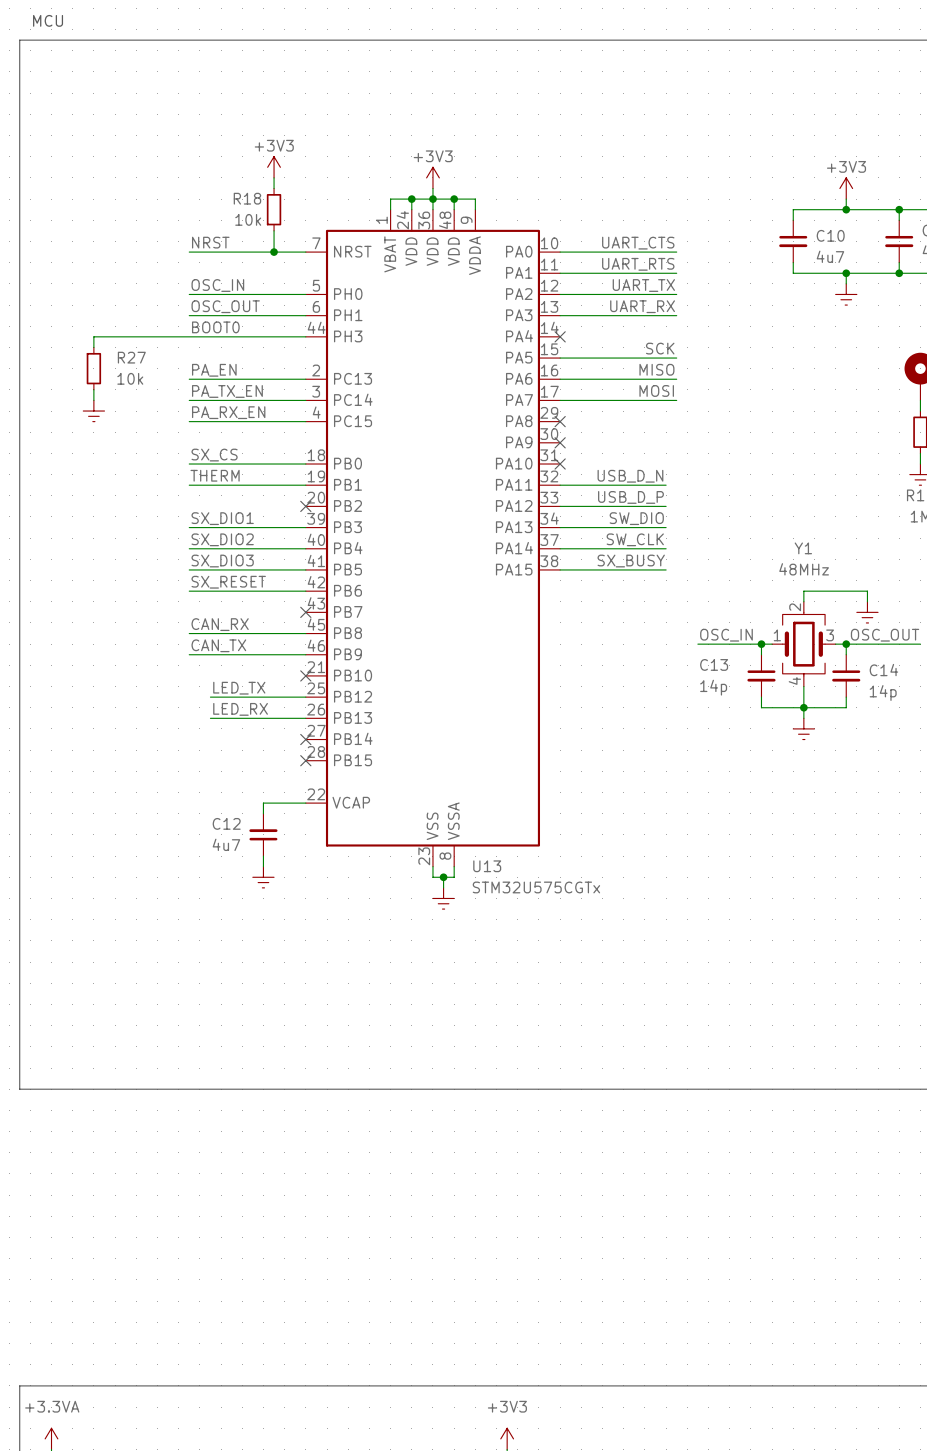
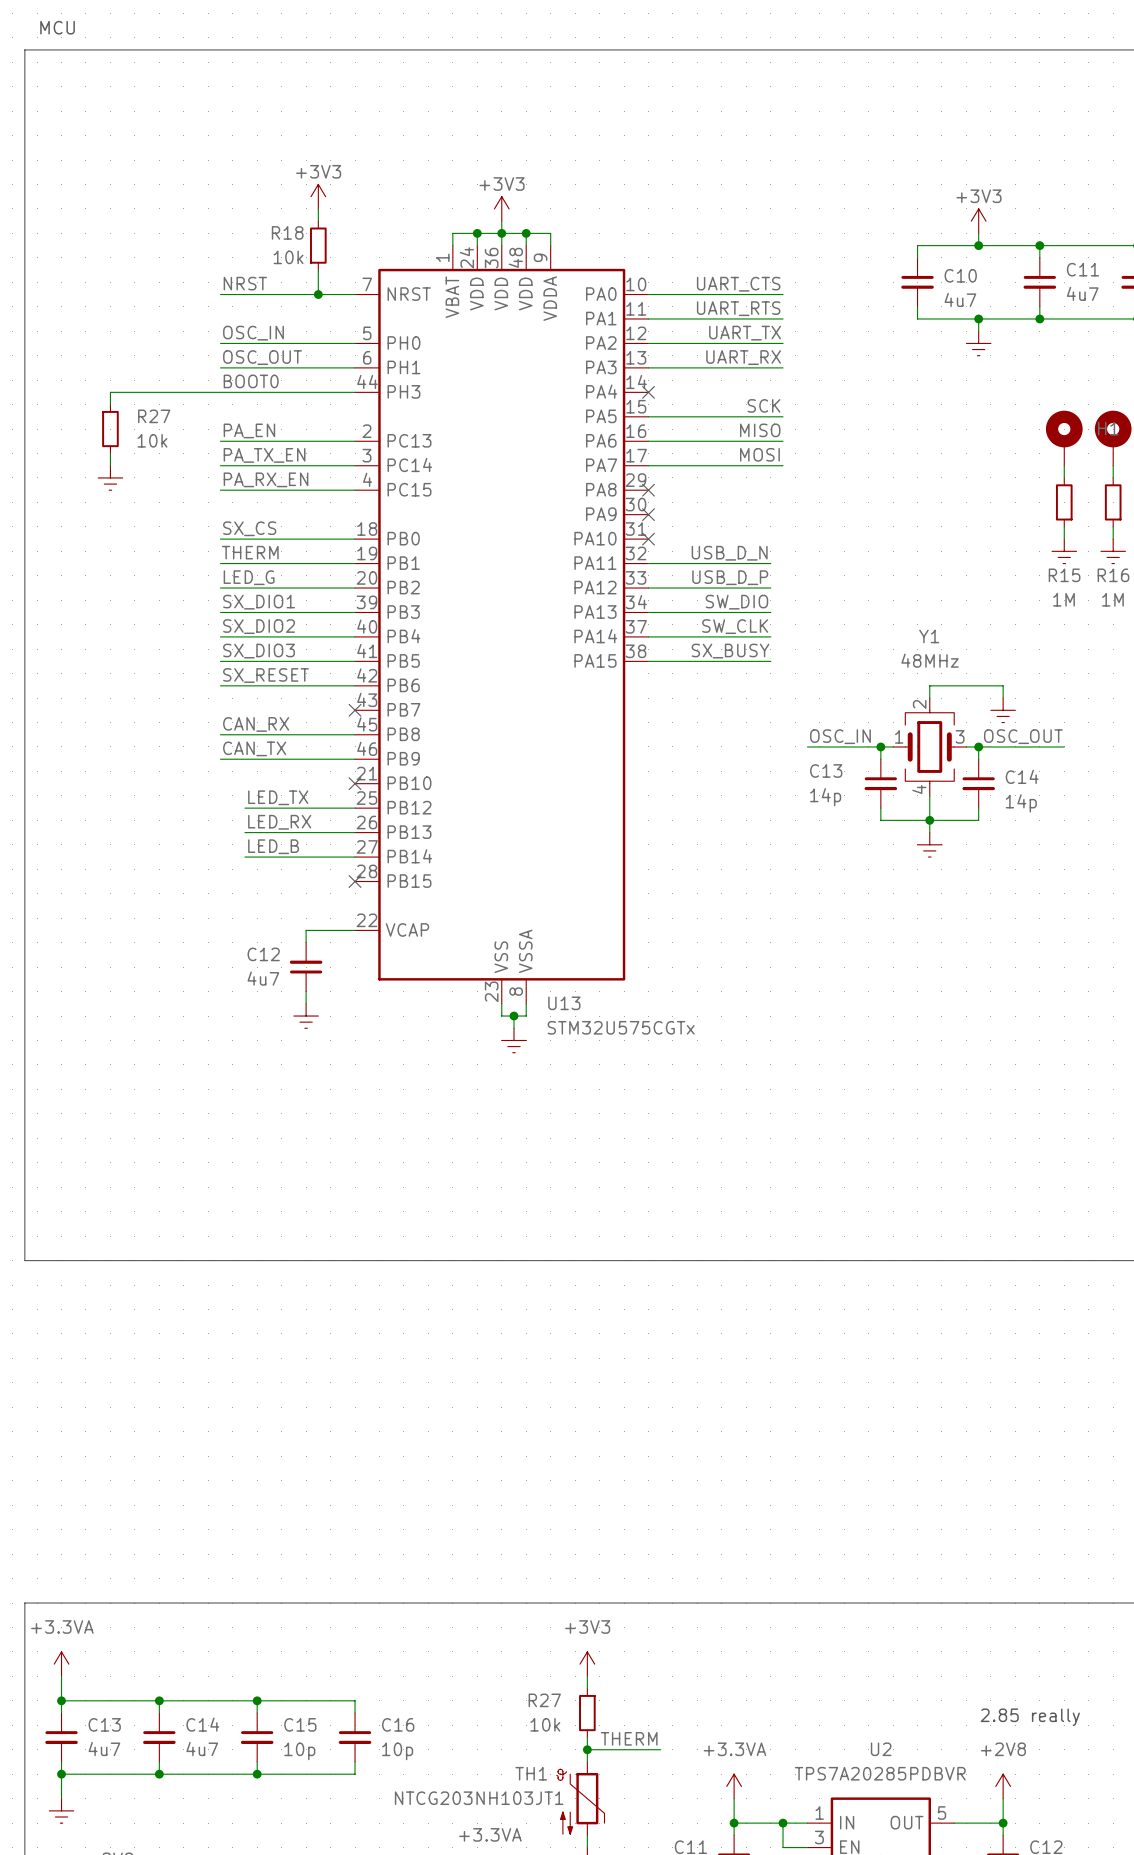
label: none -> LED_G (249, 577)
wire: none -> (220, 588) (355, 588)
no-connect mark: (305, 506) -> none
label: none -> LED_B (273, 846)
wire: none -> (244, 857) (355, 857)
no-connect mark: (305, 739) -> none

